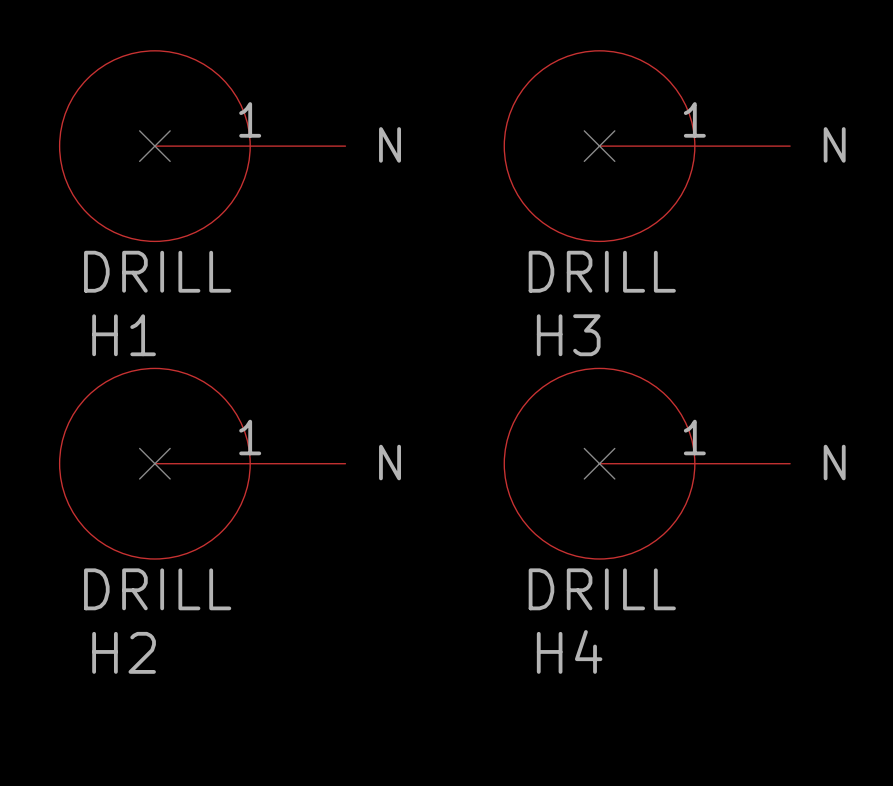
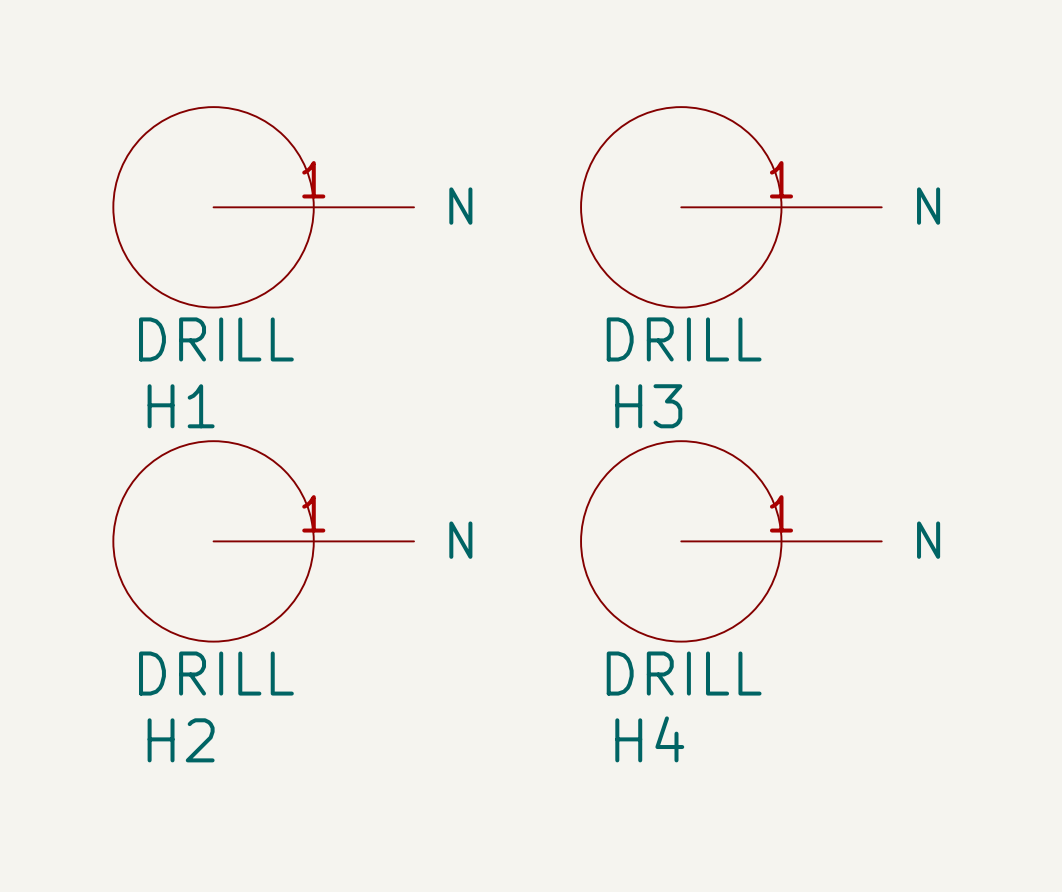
no-connect mark: (154, 146) -> none
no-connect mark: (599, 146) -> none
no-connect mark: (154, 463) -> none
no-connect mark: (599, 463) -> none

